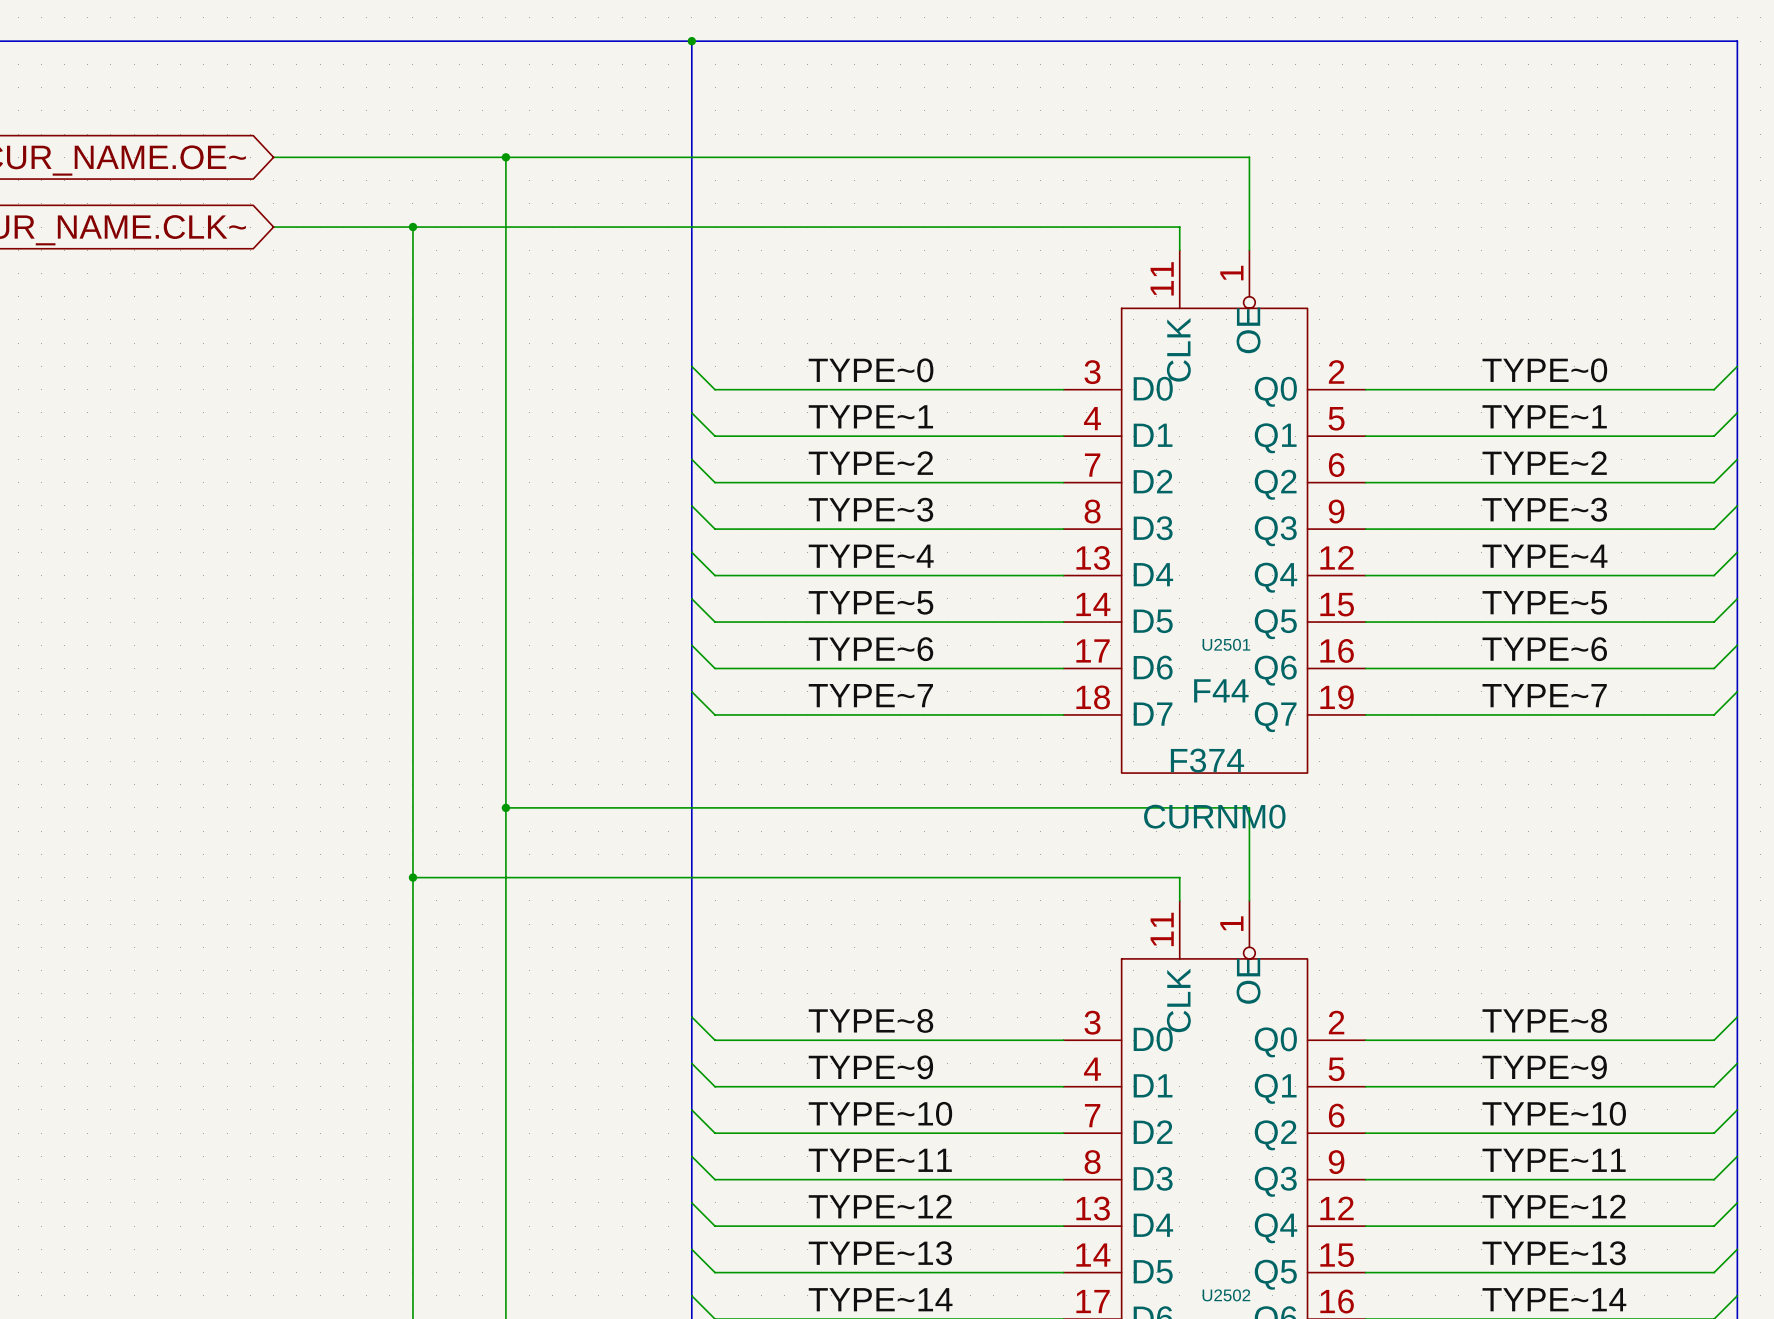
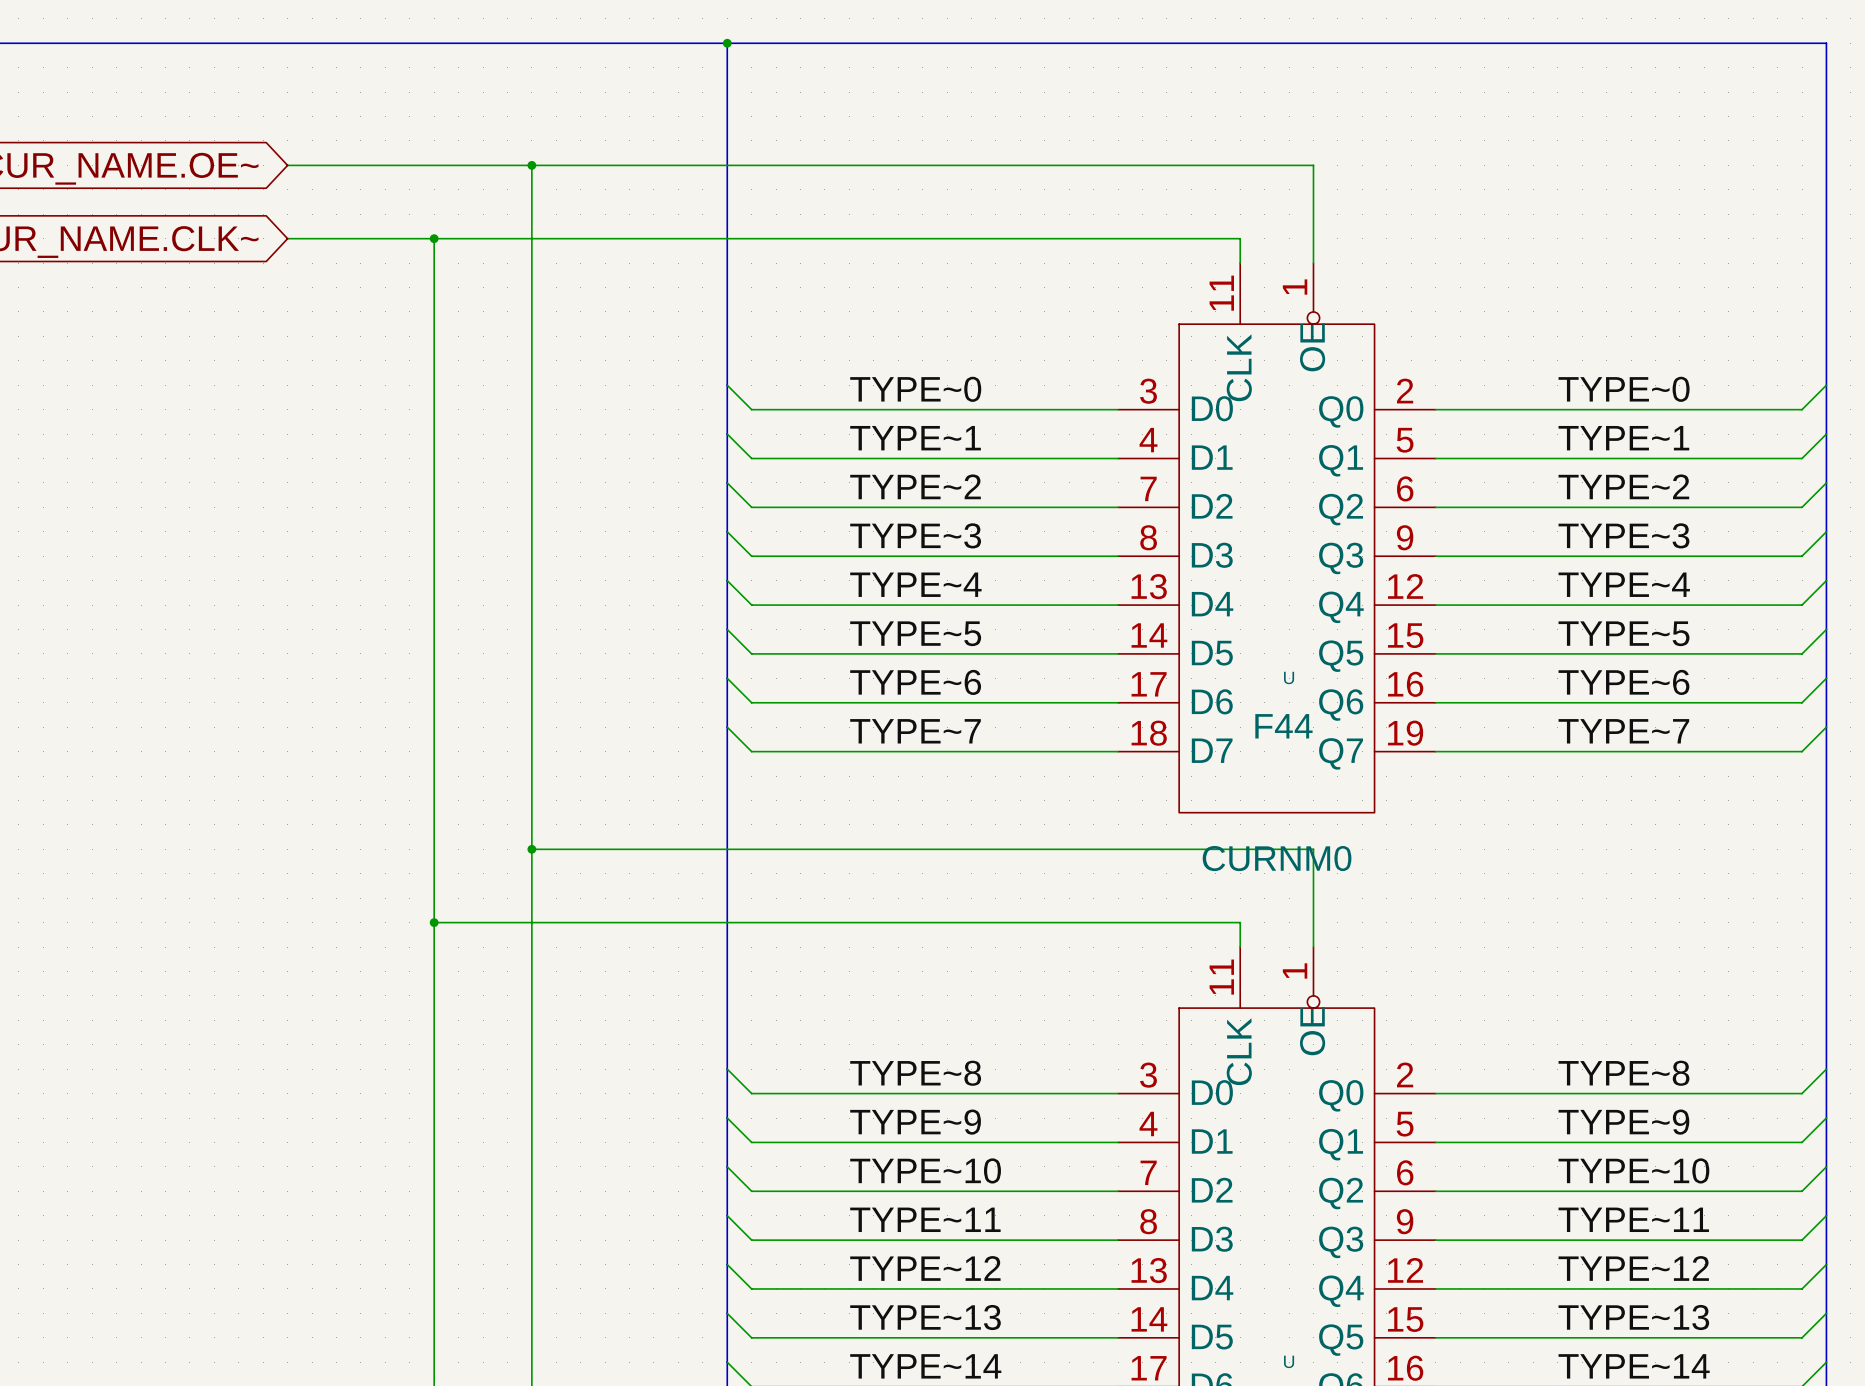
U2501 name: U2501 (1226, 644) -> U (1289, 677)
U2501 value: F374 (1207, 760) -> none
U2502 name: U2502 (1226, 1295) -> U (1289, 1361)

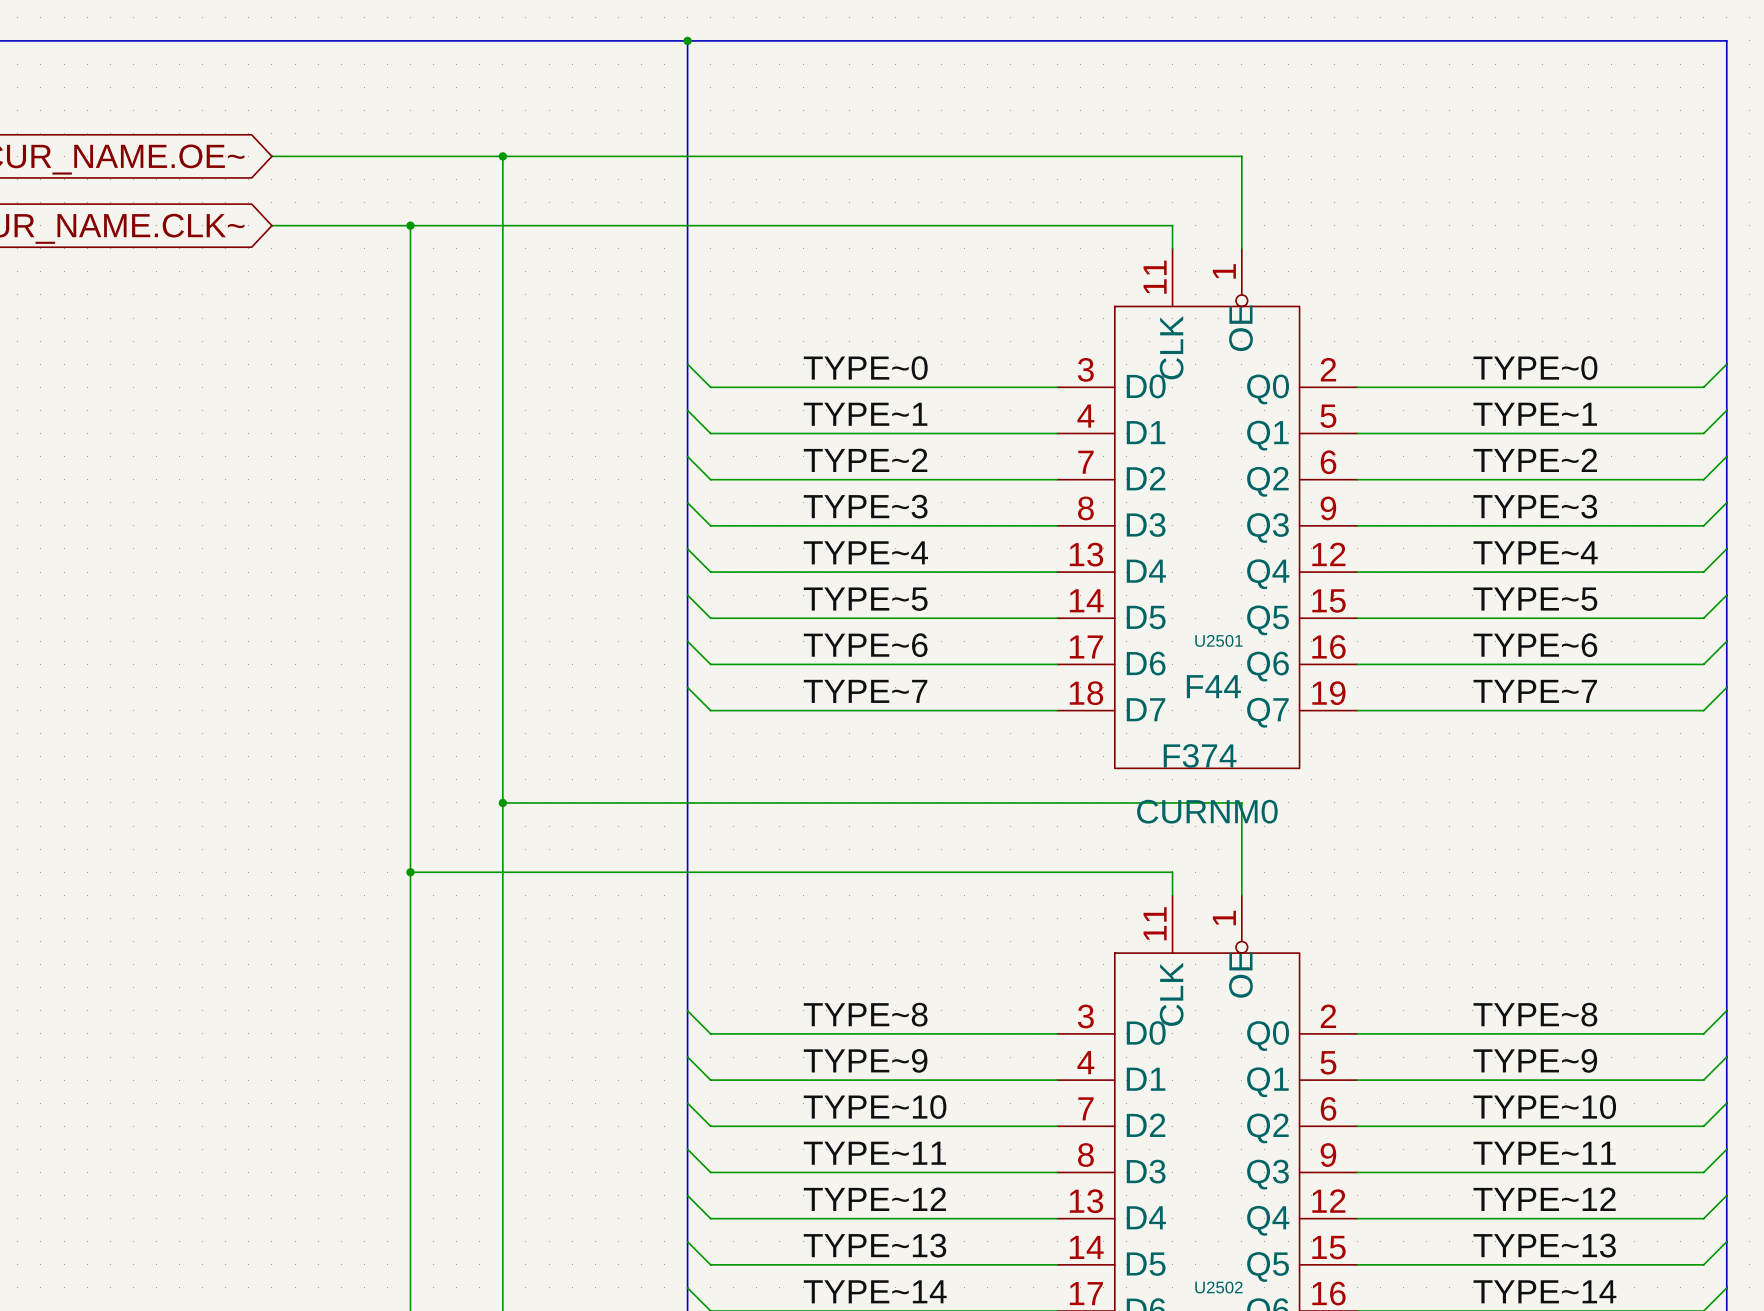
U name: U (1289, 677) -> U2501 (1218, 640)
U value: none -> F374 (1200, 755)
U name: U (1289, 1361) -> U2502 (1218, 1287)

